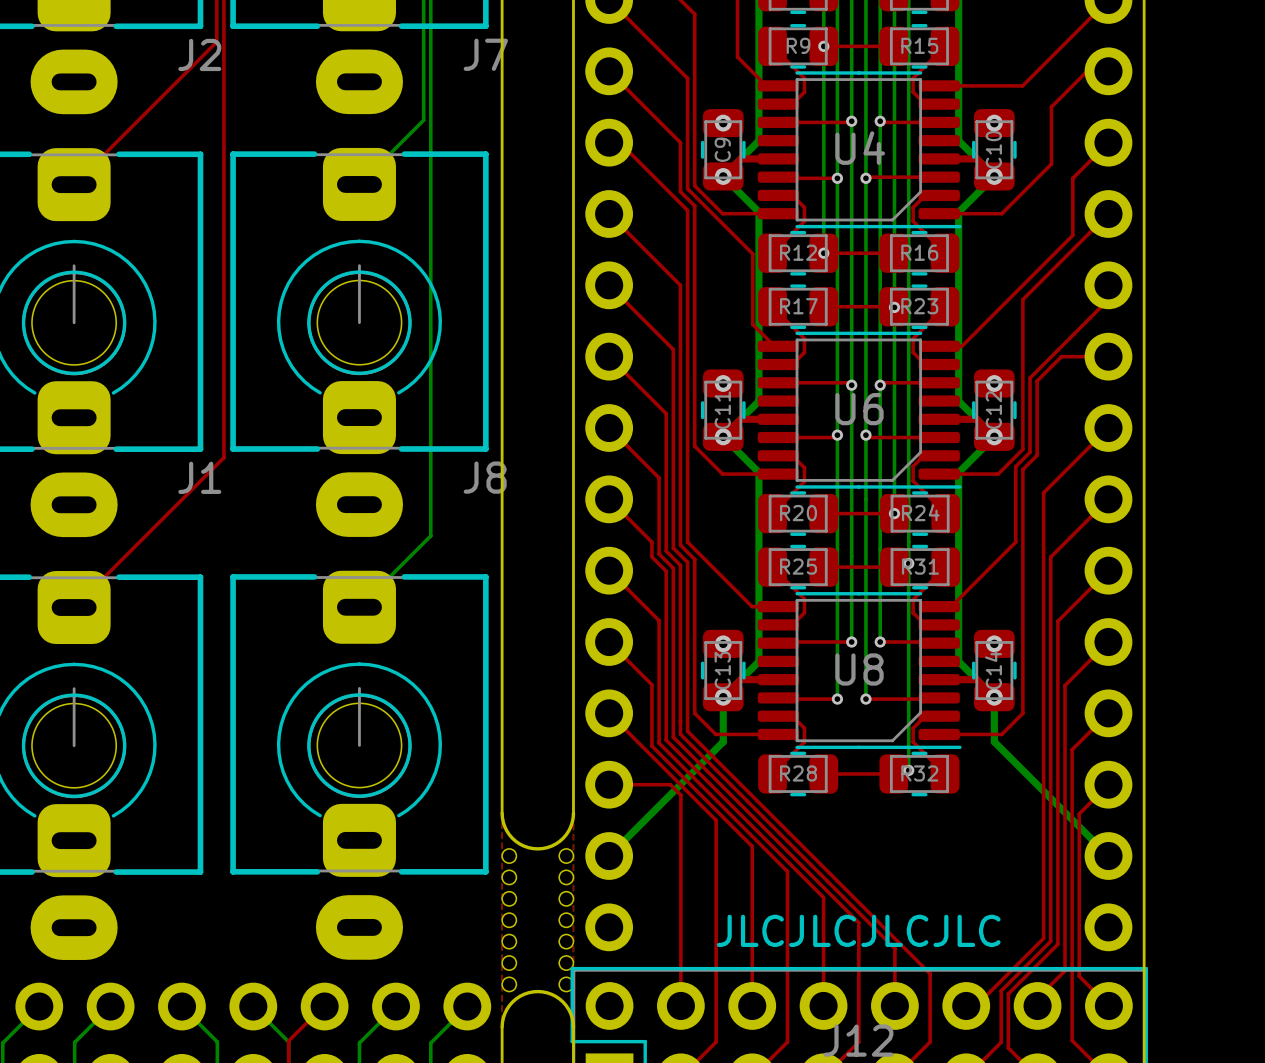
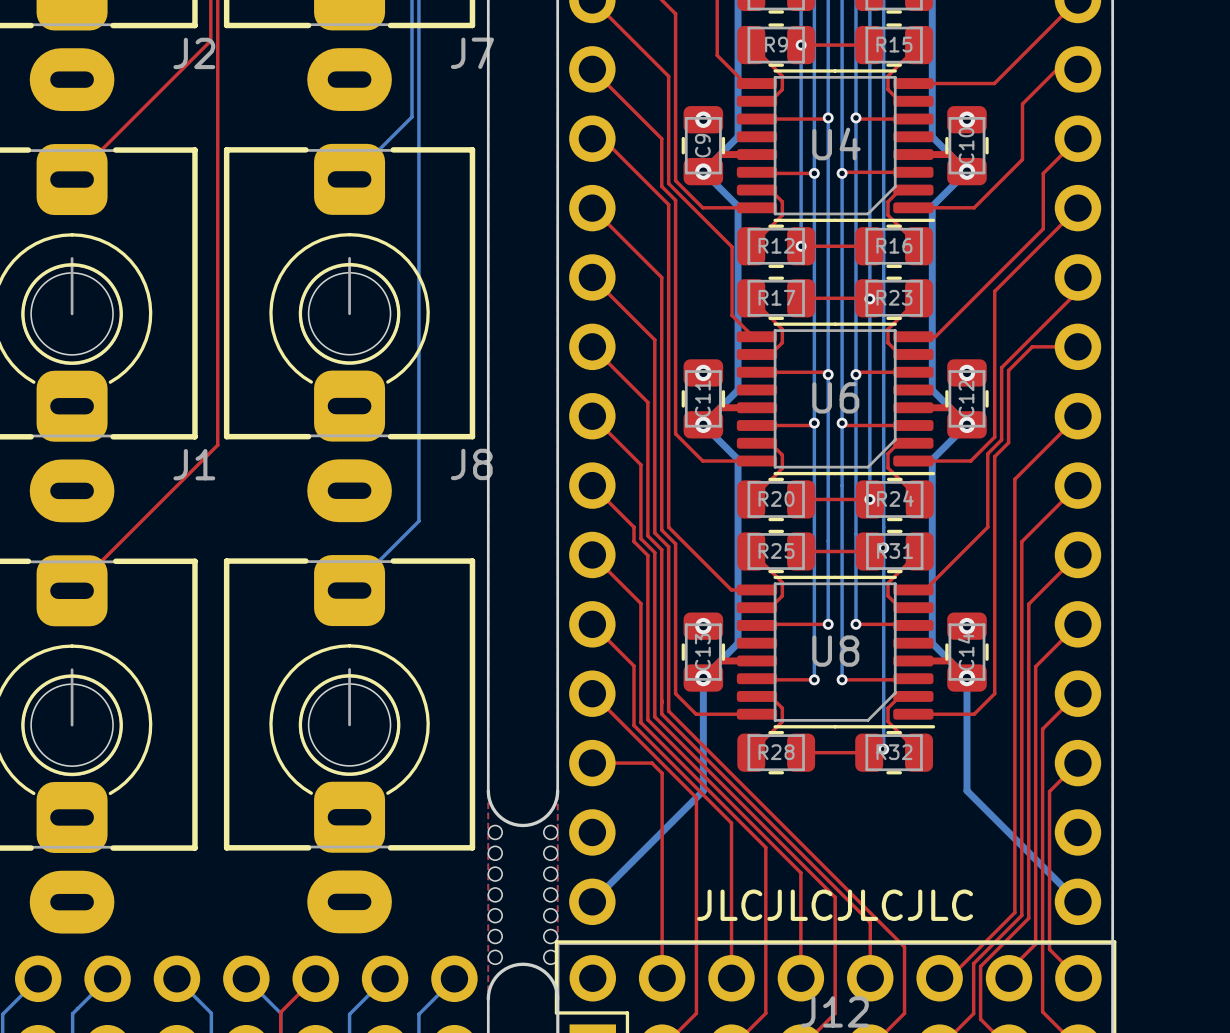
bottom track: (723, 741) (609, 856) -> (703, 721) (703, 790) (592, 901)
bottom track: (994, 741) (1108, 856) -> (966, 721) (966, 790) (1077, 901)

